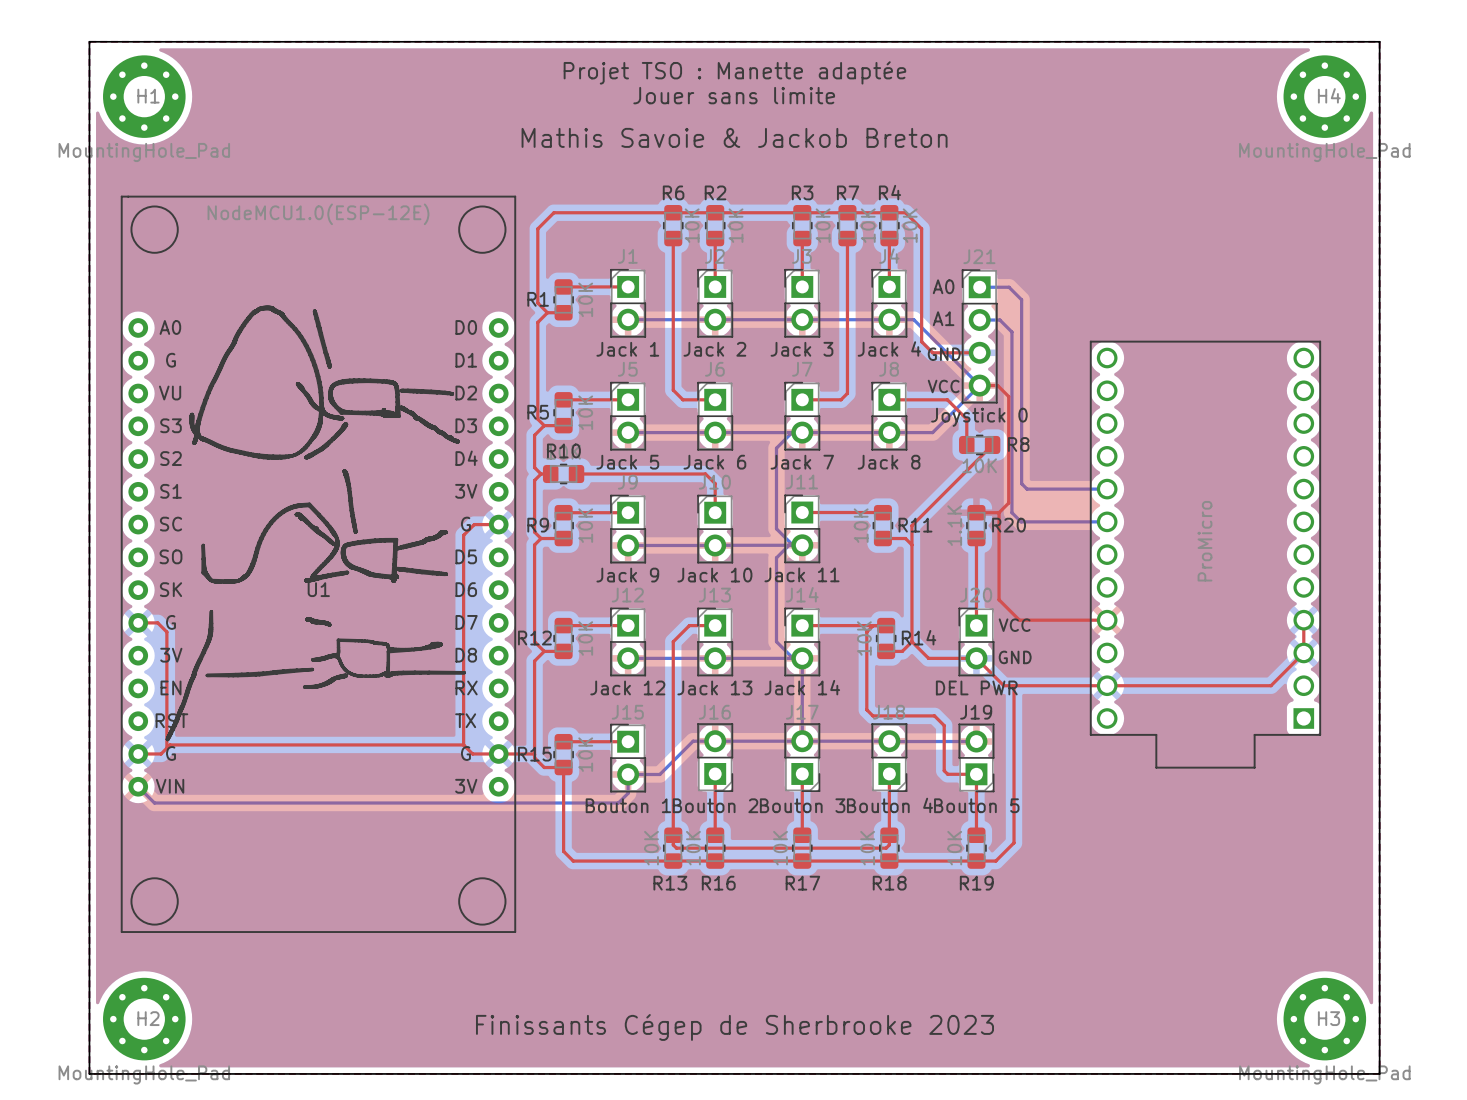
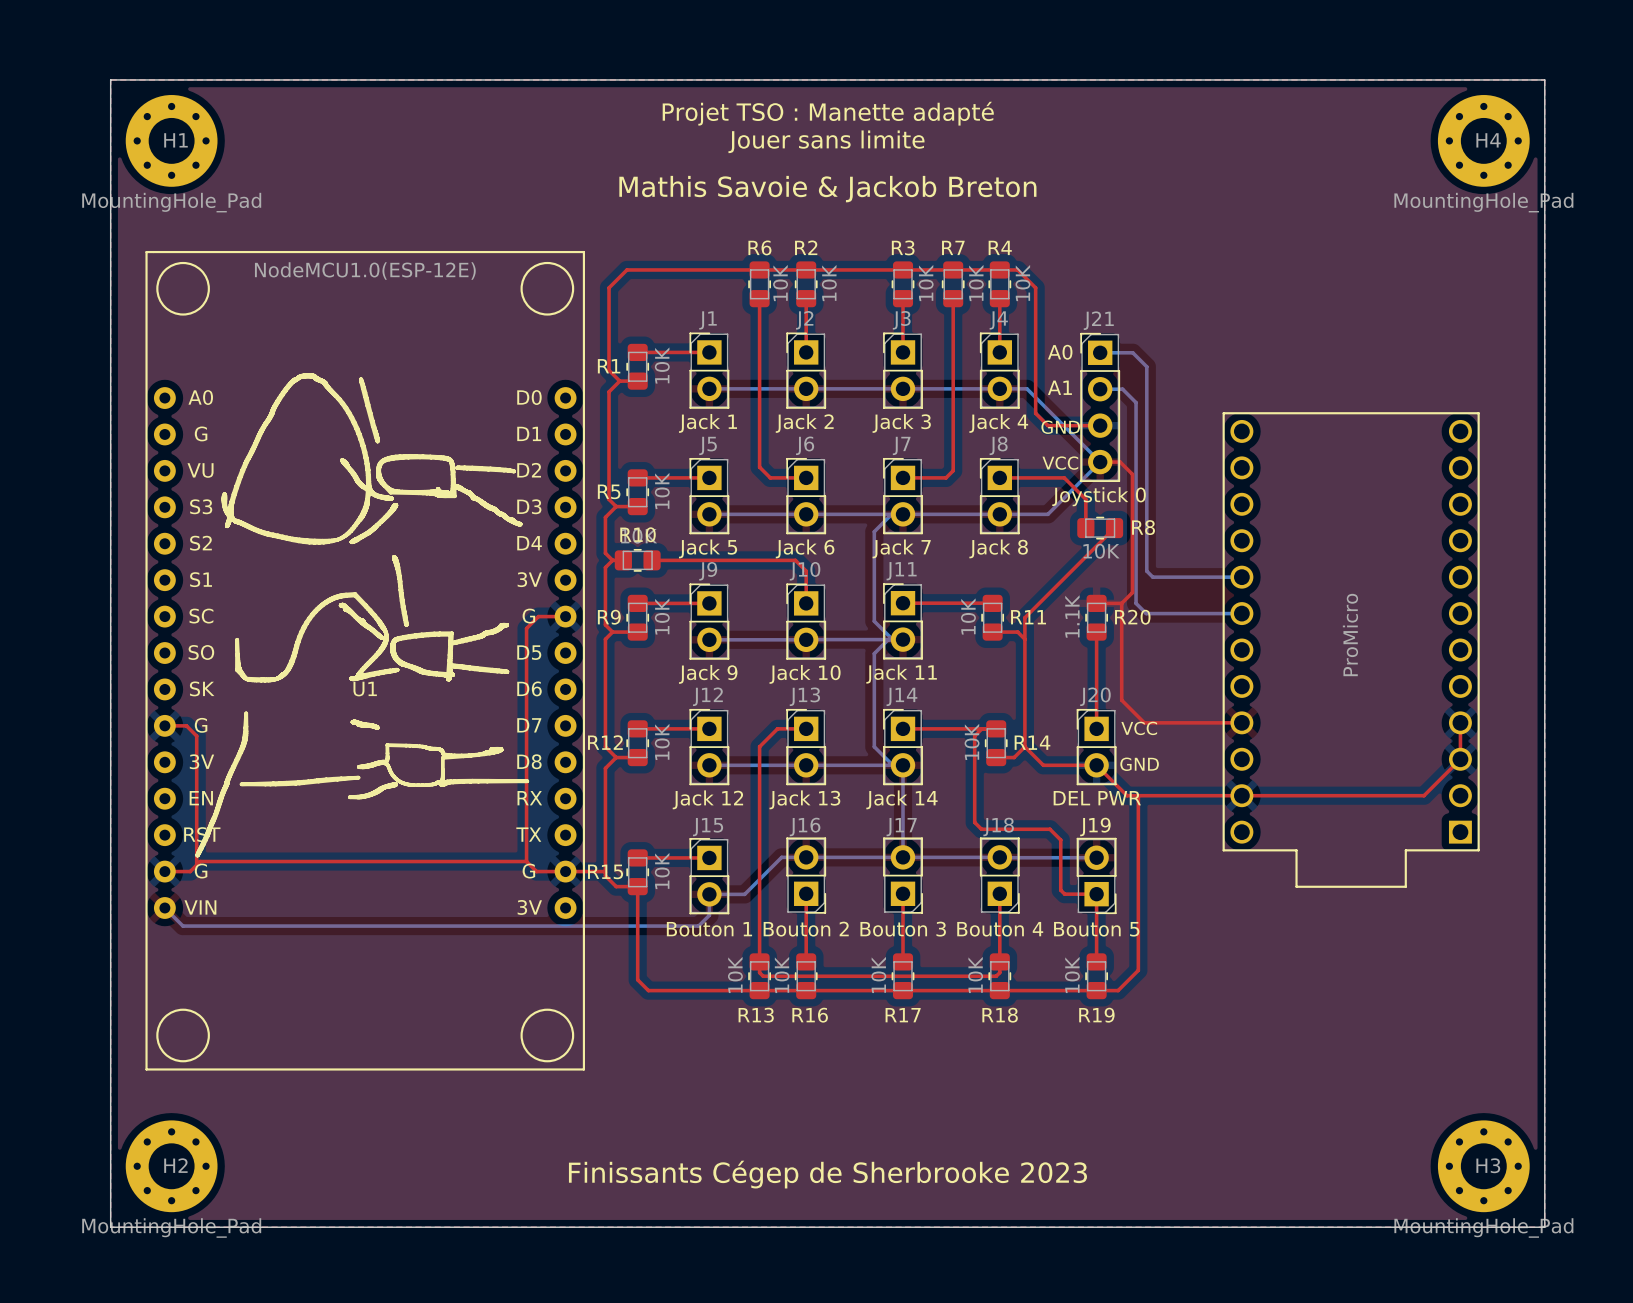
text: Projet TSO : Manette adaptée (734, 72) -> Projet TSO : Manette adapté (828, 113)

